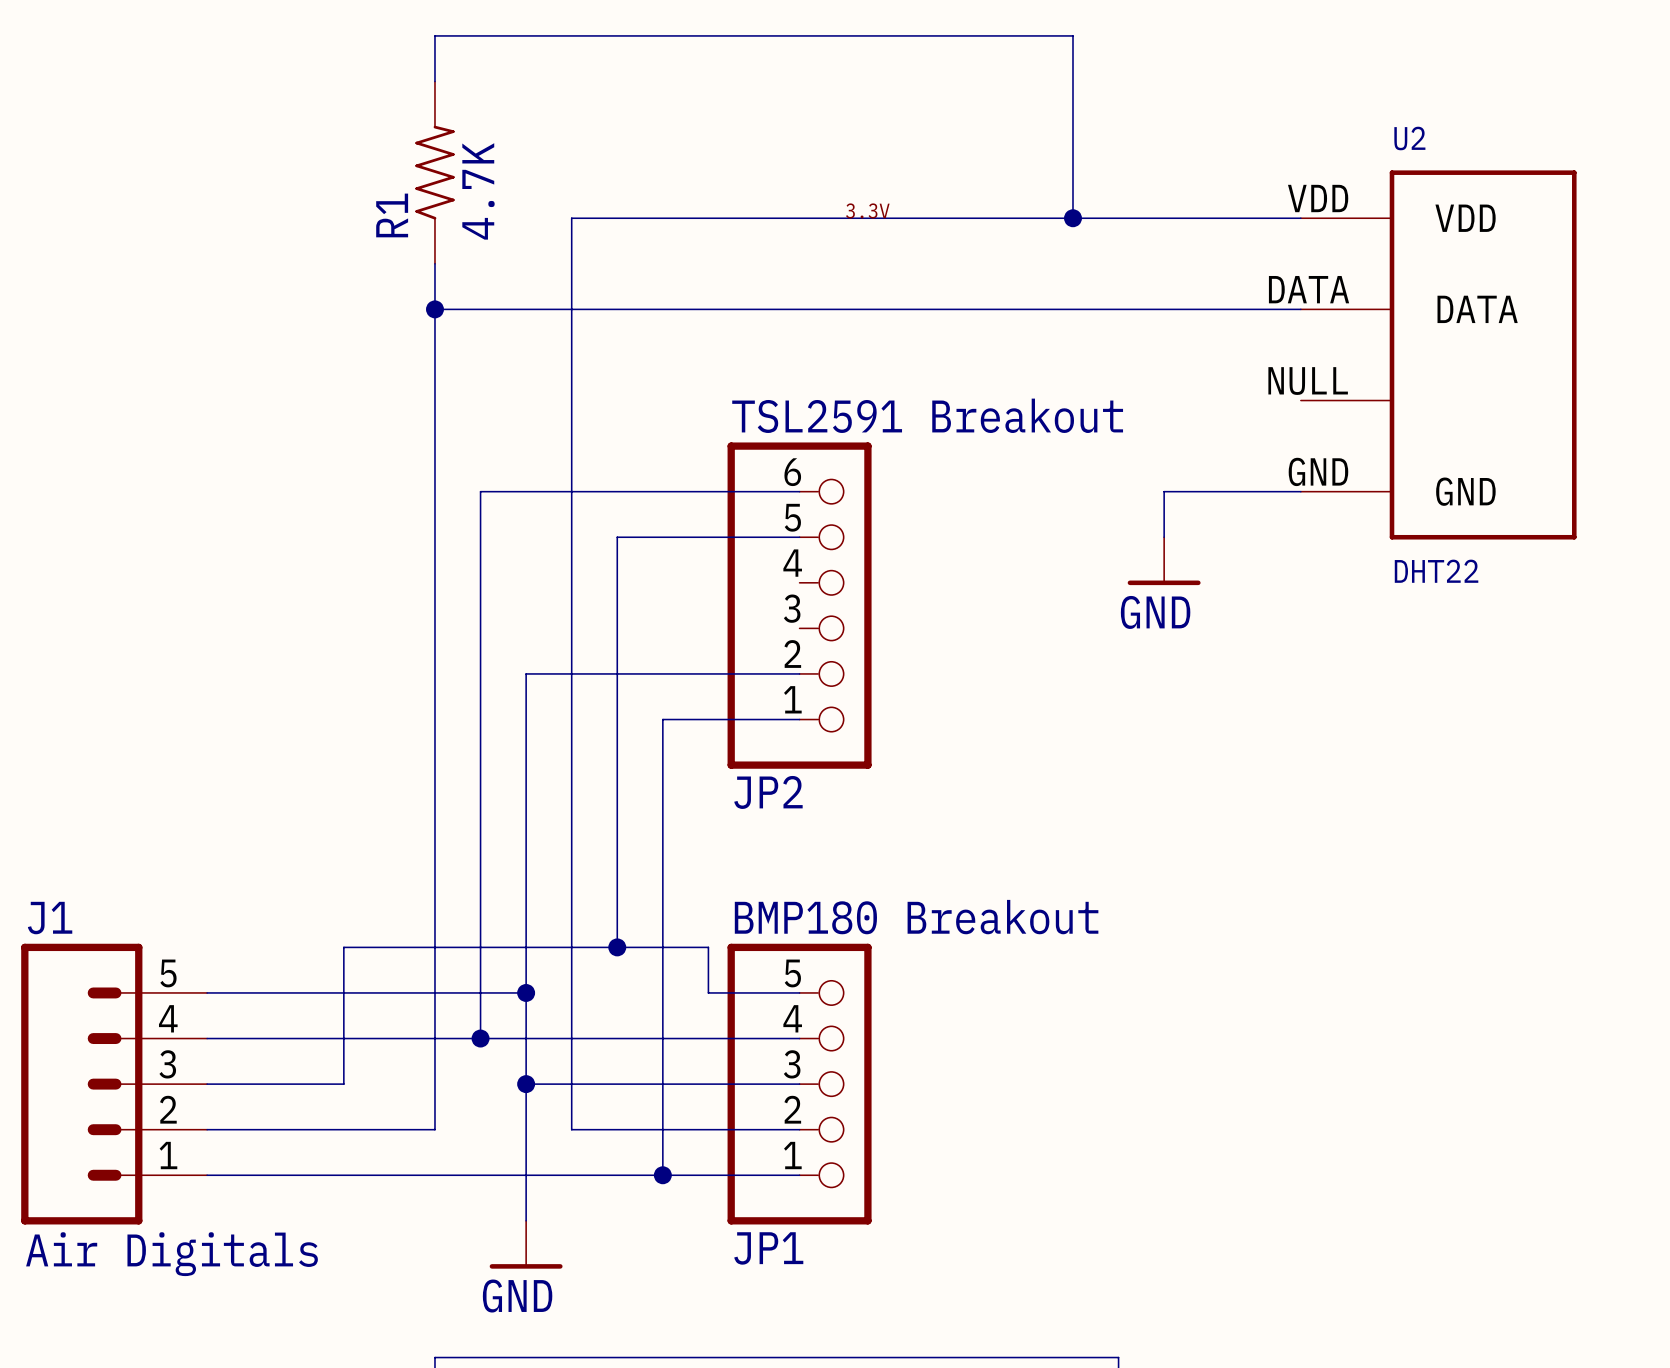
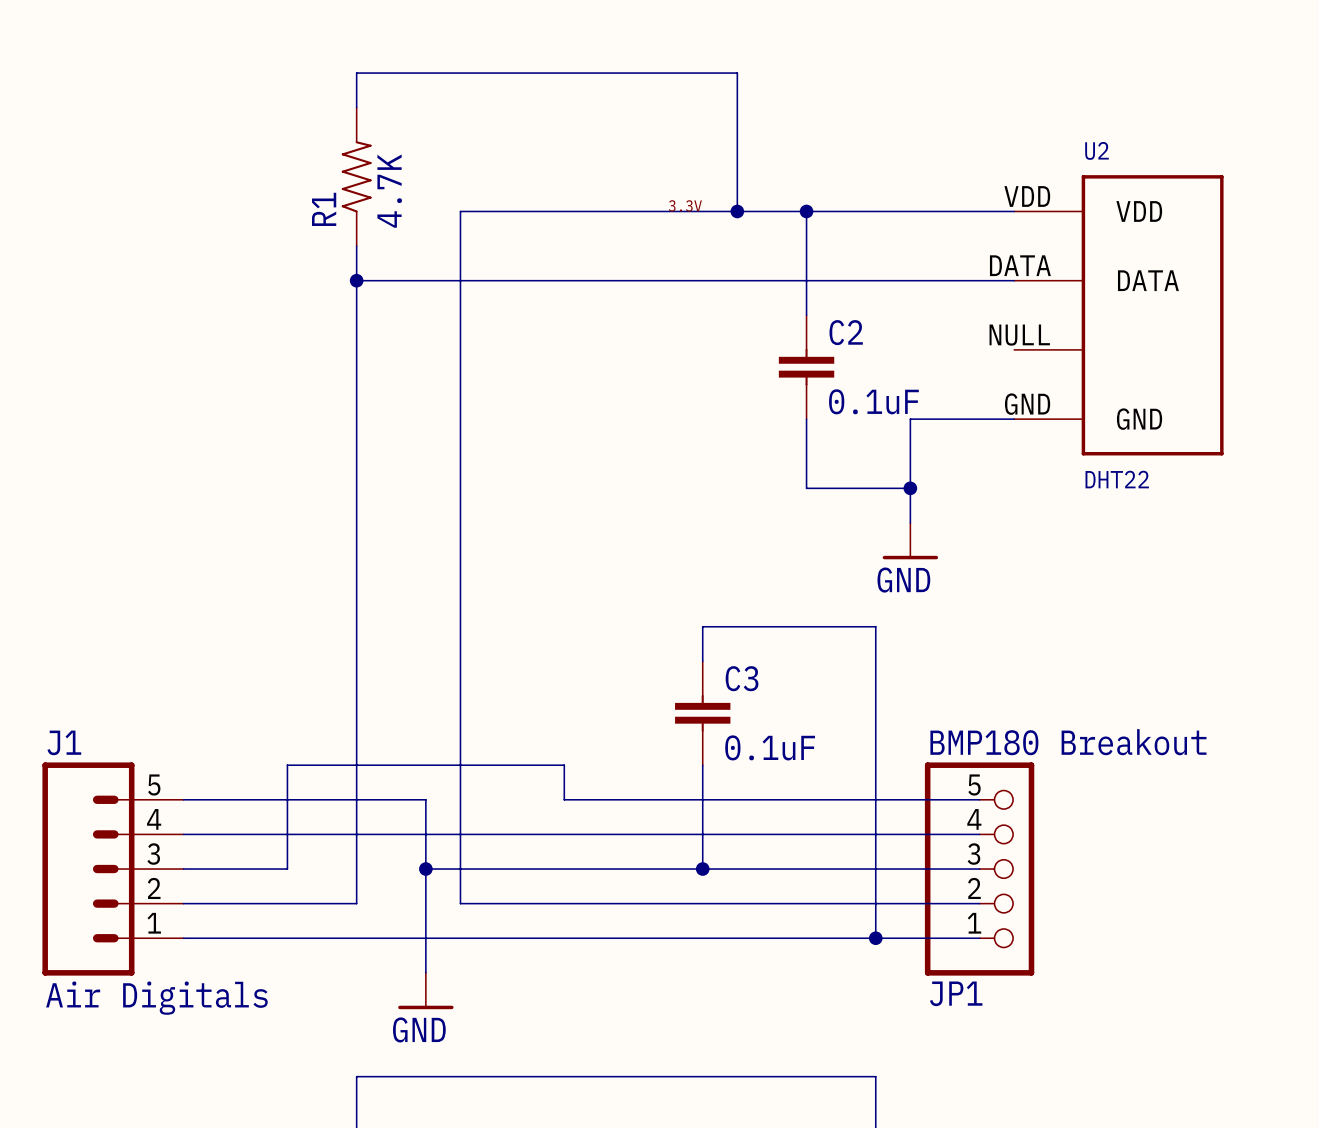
wire: (936, 35) (1072, 35) (1072, 218) -> (737, 73) (737, 211)
junction: none -> (737, 211)
wire: none -> (806, 211) (806, 315)
junction position: (1072, 218) -> (806, 211)
C2: none -> 0.1uF (806, 367)
wire: (799, 491) (480, 491) (480, 1038) -> none
wire: none -> (806, 419) (806, 488) (910, 488)
wire: (799, 537) (617, 537) (617, 947) -> none
power symbol position: GND (1164, 561) -> GND (910, 541)
junction: none -> (910, 488)
JP2: TSL2591 Breakout (799, 605) -> none
wire: (799, 673) (526, 673) (526, 992) -> none
wire: (799, 719) (662, 719) (662, 1175) -> none
wire: none -> (702, 661) (702, 626) (875, 626) (875, 938)
C3: none -> 0.1uF (702, 713)
junction: (617, 947) -> none
wire: none -> (702, 765) (702, 869)
junction: (526, 992) -> none
wire: none -> (633, 799) (979, 799)
junction: (480, 1038) -> none
wire: none -> (633, 834) (979, 834)
wire: none -> (633, 869) (979, 869)
JP1 position: (799, 1084) -> (979, 869)
junction: none -> (702, 869)
wire: none -> (633, 903) (979, 903)
junction: (662, 1175) -> none
wire: none -> (633, 938) (979, 938)
junction: none -> (875, 938)

